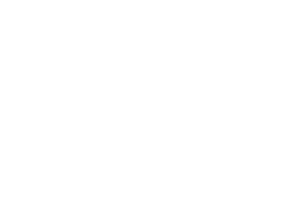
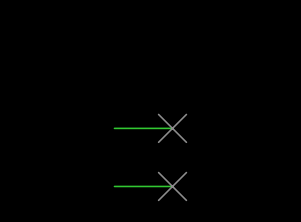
wire: none -> (114, 128) (172, 128)
no-connect mark: none -> (172, 128)
wire: none -> (114, 186) (172, 186)
no-connect mark: none -> (172, 186)

